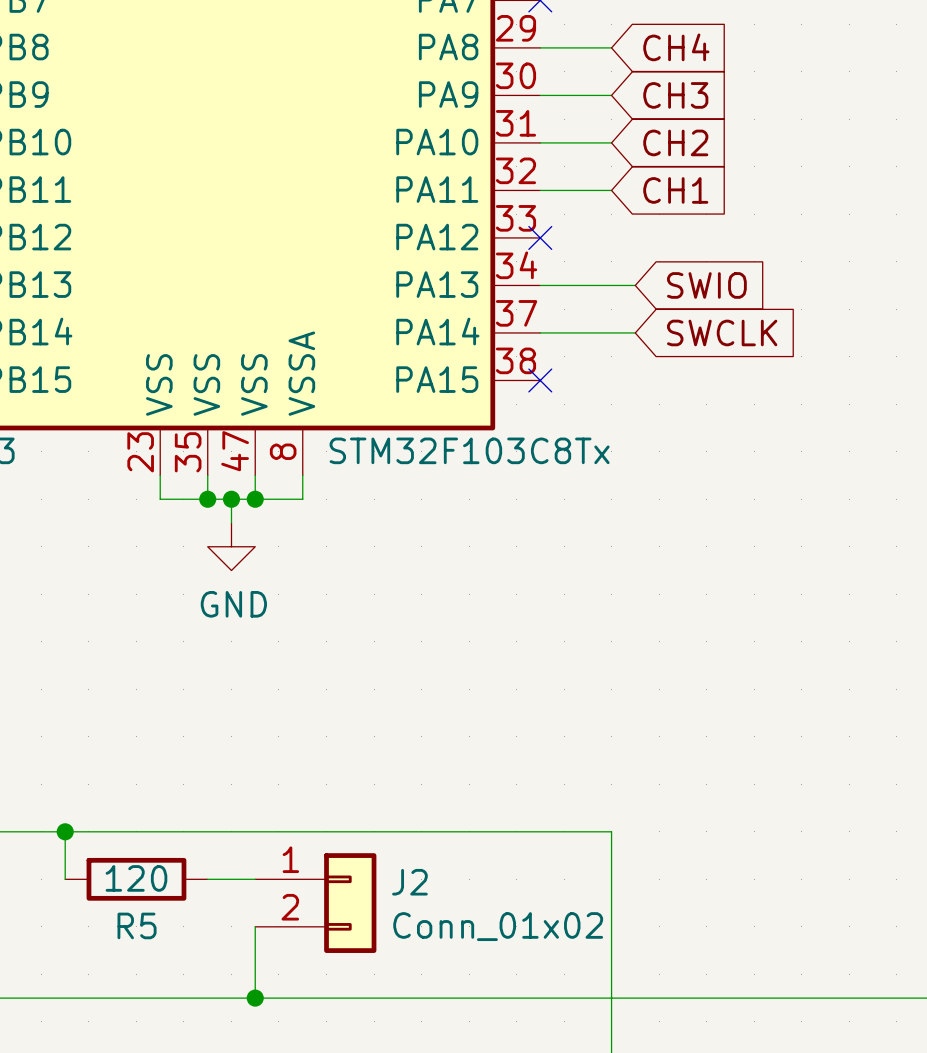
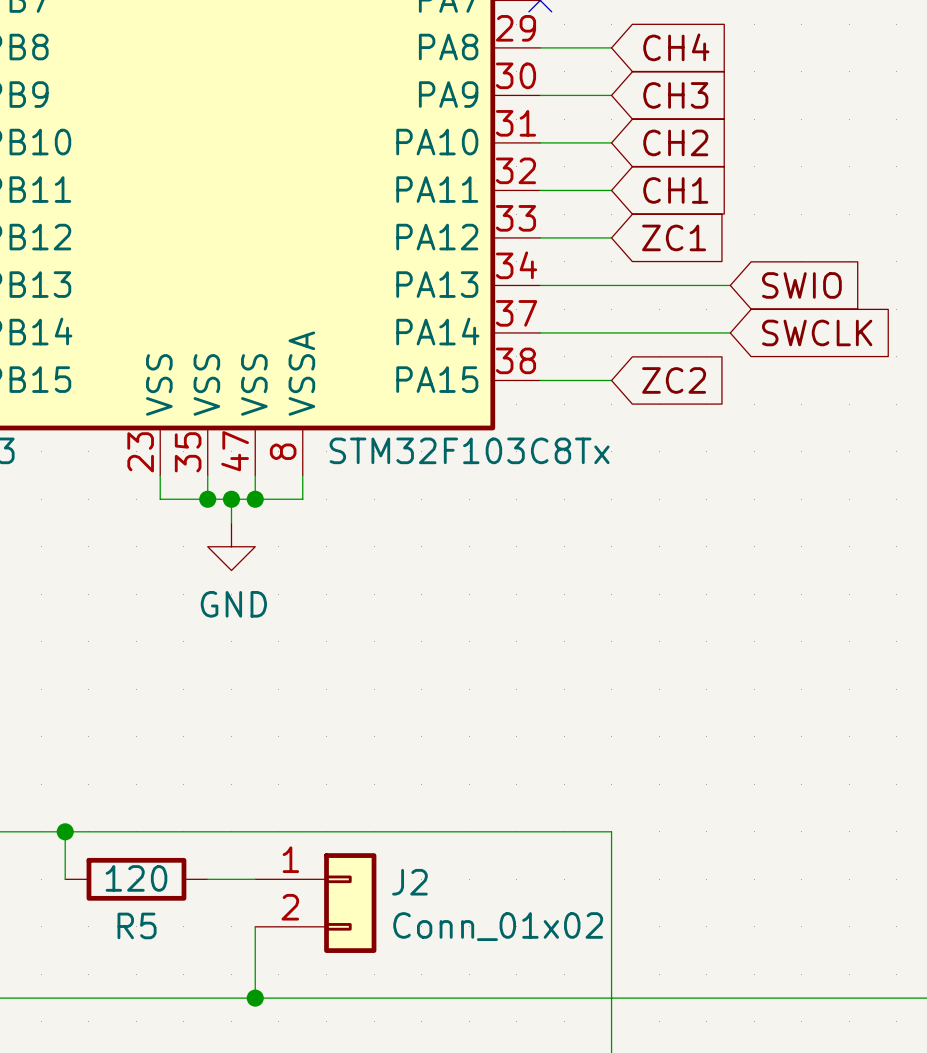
wire: none -> (540, 237) (611, 237)
no-connect mark: (540, 237) -> none
global label: none -> ZC1 (674, 237)
wire: none -> (635, 285) (730, 285)
global label position: SWIO (706, 285) -> SWIO (801, 285)
wire: none -> (635, 332) (730, 332)
global label position: SWCLK (722, 332) -> SWCLK (817, 332)
wire: none -> (540, 380) (611, 380)
no-connect mark: (540, 380) -> none
global label: none -> ZC2 (674, 380)

